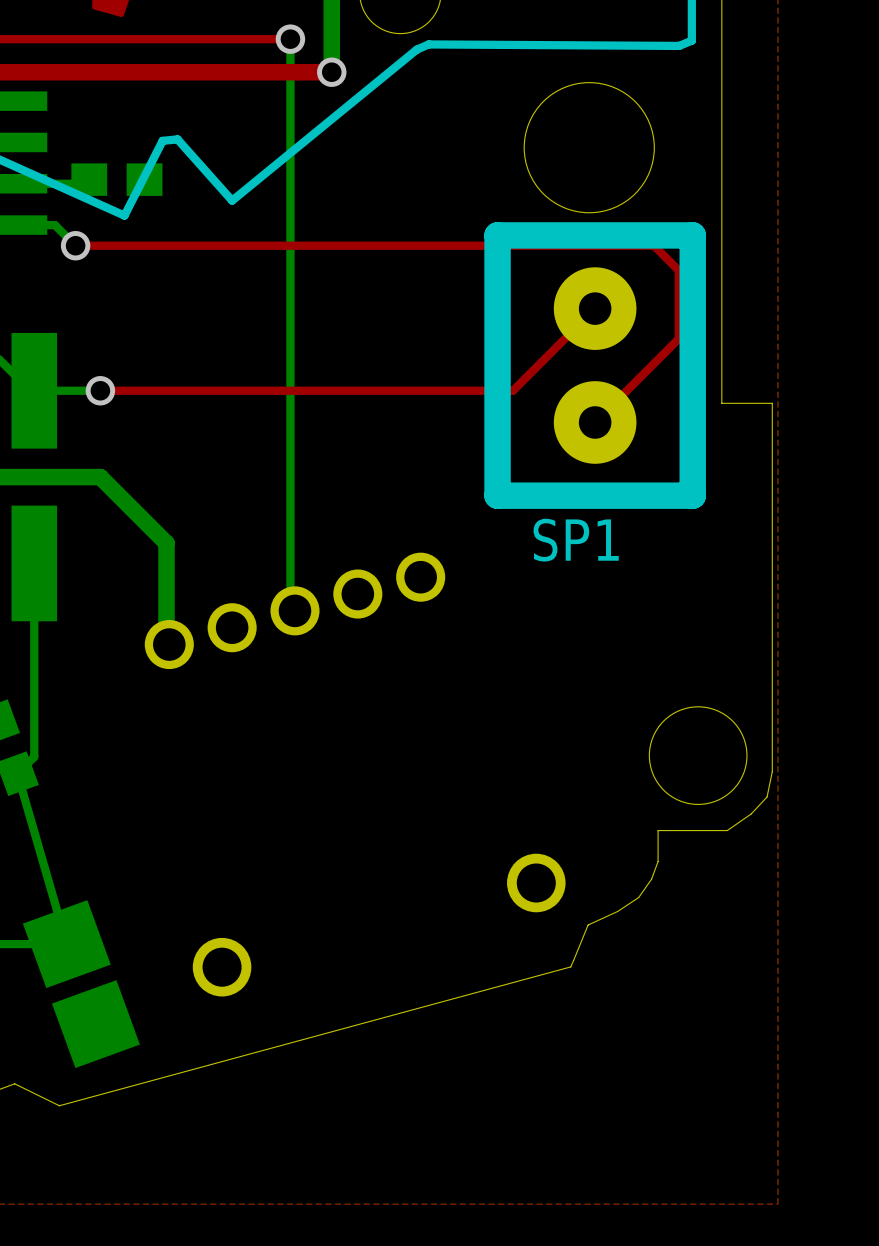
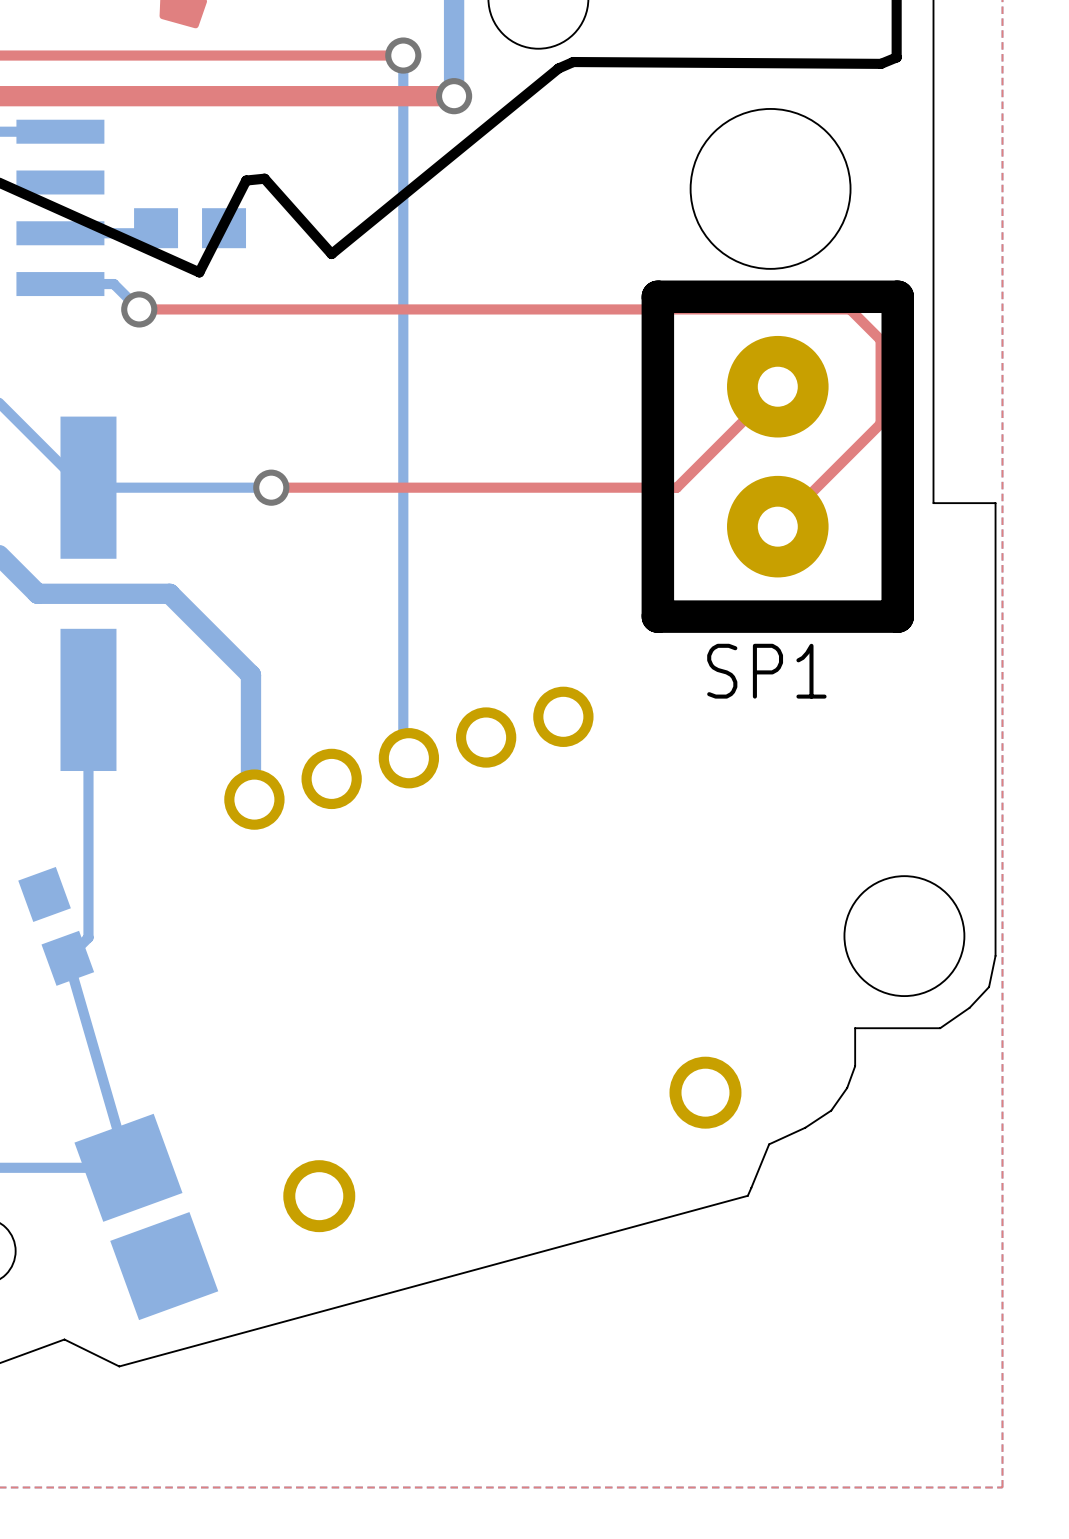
bottom track: none -> (169, 487) (271, 487)
top track: (100, 390) (183, 390) -> none
via position: (100, 390) -> (271, 487)

